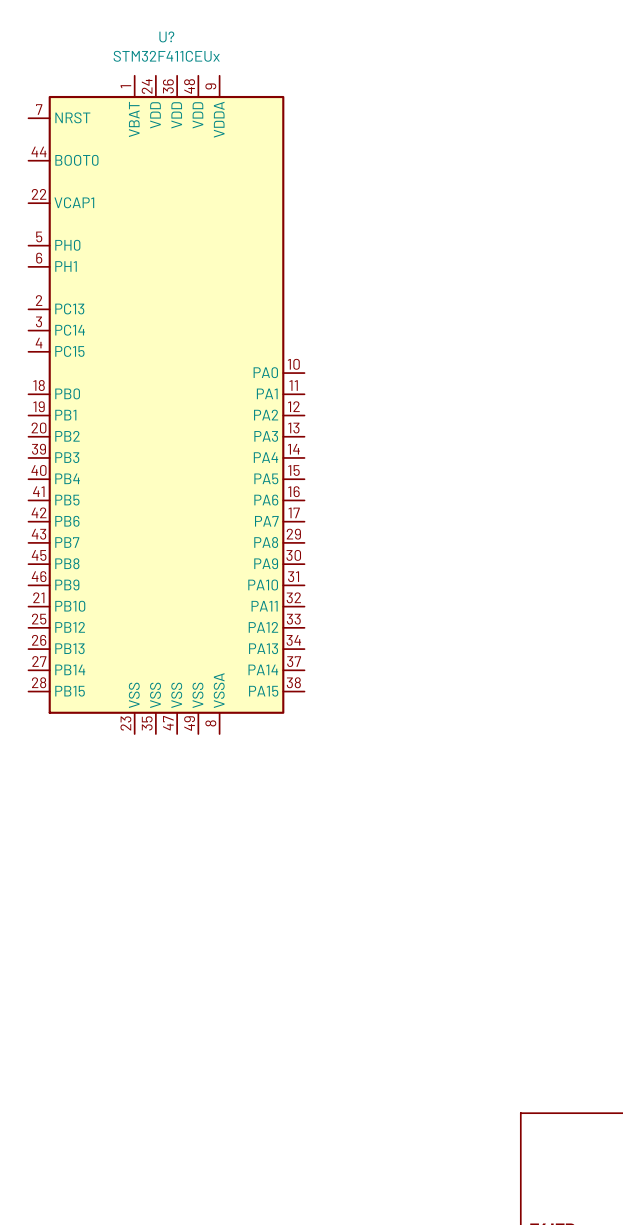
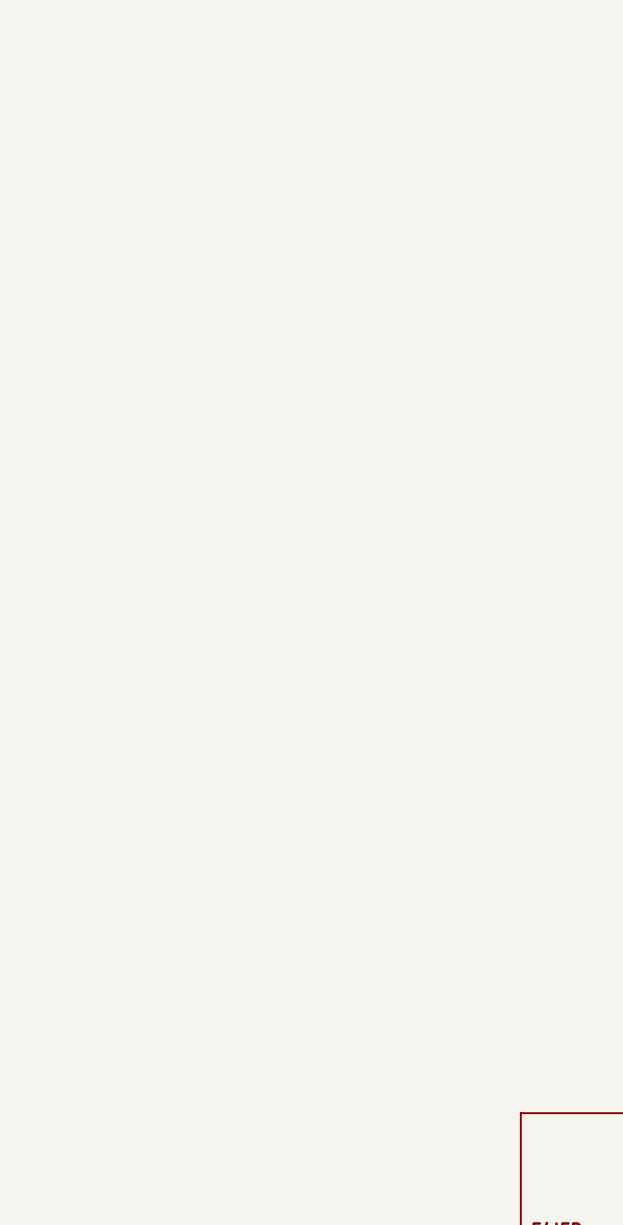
U?: STM32F411CEUx (166, 404) -> none

